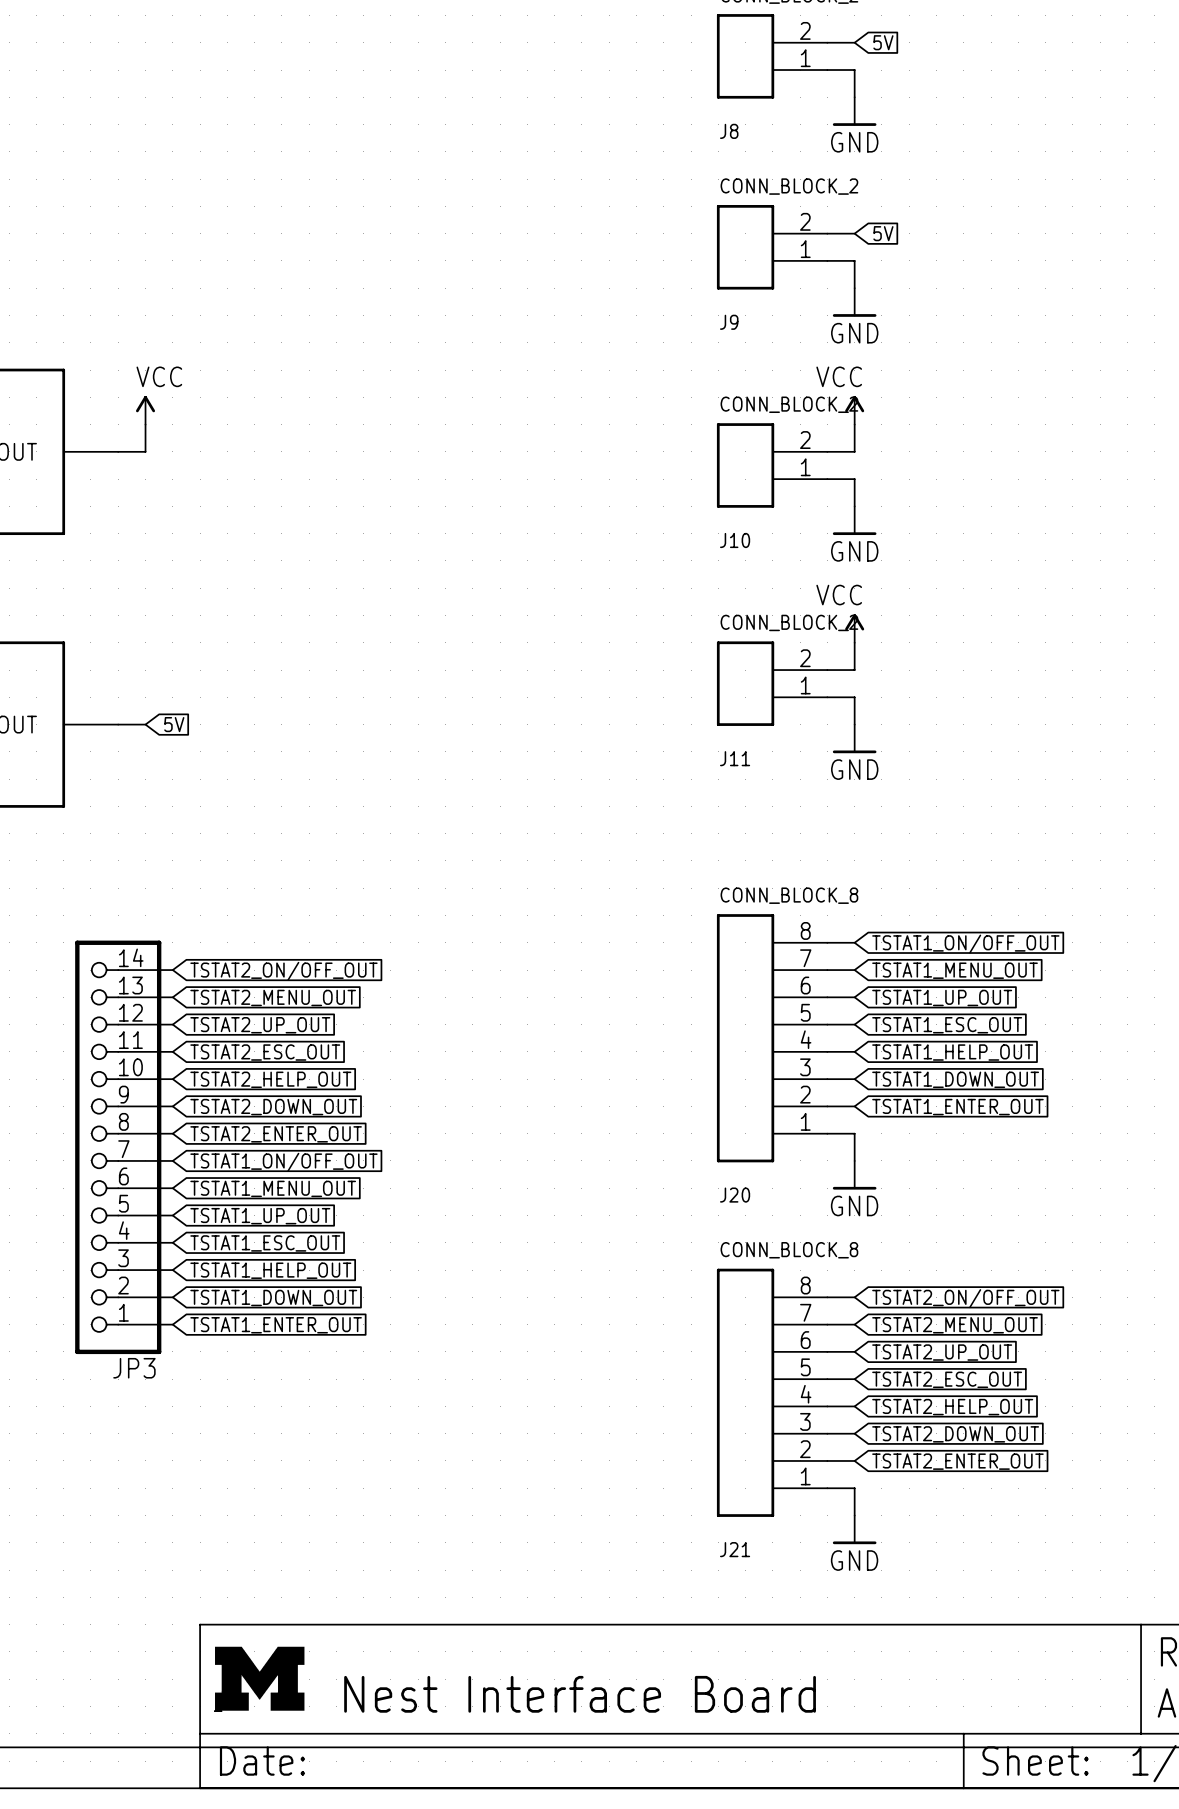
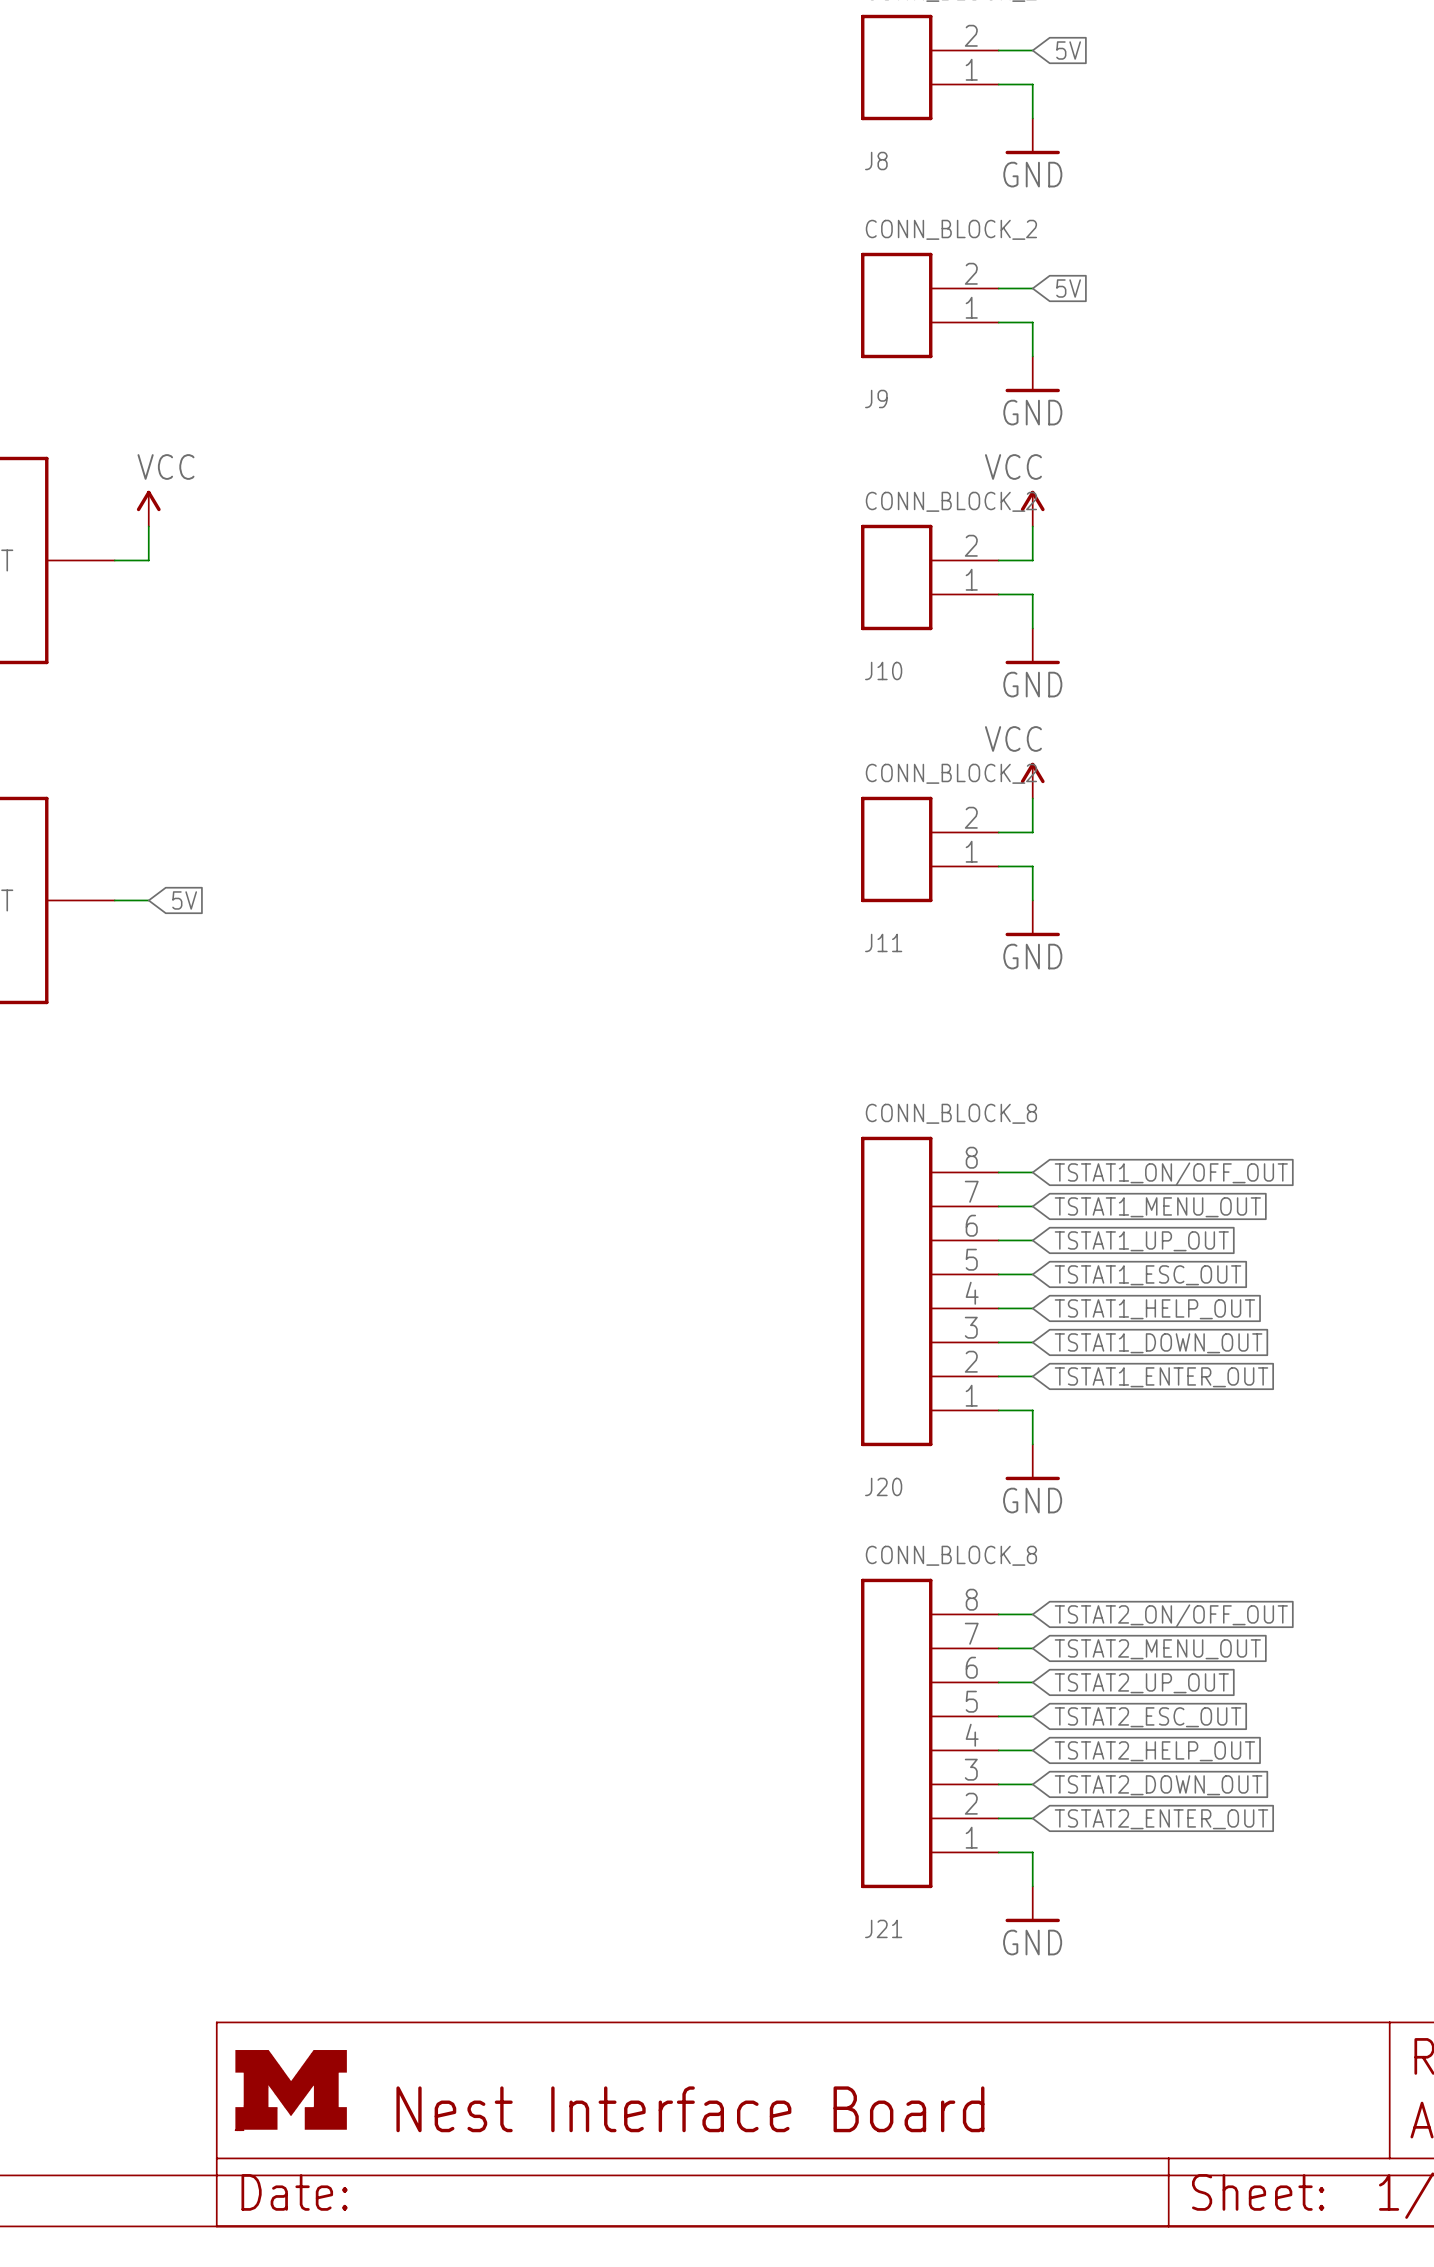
wire: (118, 970) (172, 970) -> none
global label: TSTAT2_ON/OFF_OUT (283, 971) -> none
wire: (118, 997) (172, 997) -> none
global label: TSTAT2_MENU_OUT (273, 997) -> none
wire: (118, 1024) (172, 1024) -> none
global label: TSTAT2_UP_OUT (260, 1025) -> none
wire: (118, 1051) (172, 1051) -> none
global label: TSTAT2_ESC_OUT (265, 1052) -> none
wire: (118, 1079) (172, 1079) -> none
global label: TSTAT2_HELP_OUT (270, 1079) -> none
wire: (118, 1106) (172, 1106) -> none
global label: TSTAT2_DOWN_OUT (273, 1107) -> none
wire: (118, 1133) (172, 1133) -> none
global label: TSTAT2_ENTER_OUT (276, 1134) -> none
JP3: (118, 1147) -> none
wire: (118, 1160) (172, 1160) -> none
global label: TSTAT1_ON/OFF_OUT (283, 1162) -> none
wire: (118, 1188) (172, 1188) -> none
global label: TSTAT1_MENU_OUT (273, 1188) -> none
wire: (118, 1215) (172, 1215) -> none
global label: TSTAT1_UP_OUT (260, 1216) -> none
wire: (118, 1242) (172, 1242) -> none
global label: TSTAT1_ESC_OUT (265, 1243) -> none
wire: (118, 1270) (172, 1270) -> none
global label: TSTAT1_HELP_OUT (270, 1270) -> none
wire: (118, 1297) (172, 1297) -> none
global label: TSTAT1_DOWN_OUT (273, 1297) -> none
wire: (118, 1324) (172, 1324) -> none
global label: TSTAT1_ENTER_OUT (276, 1325) -> none

